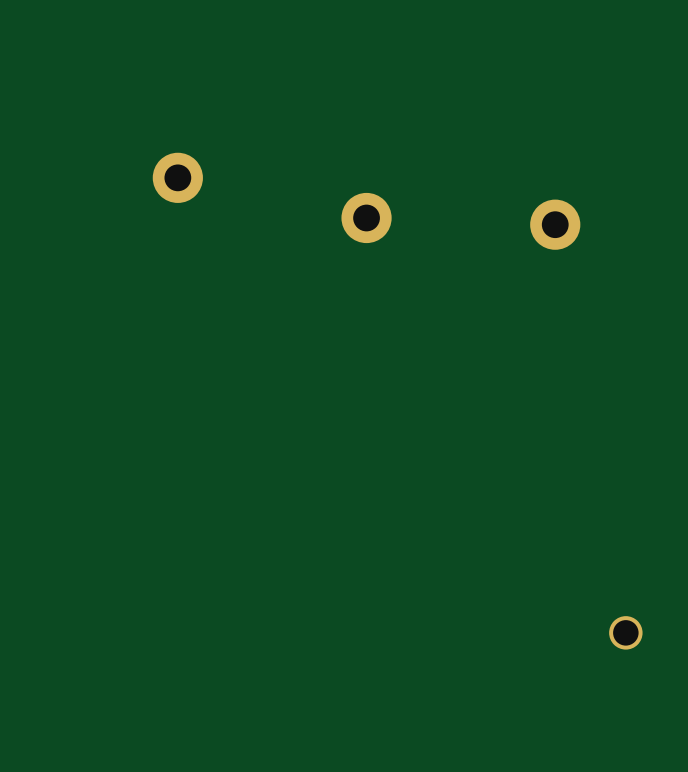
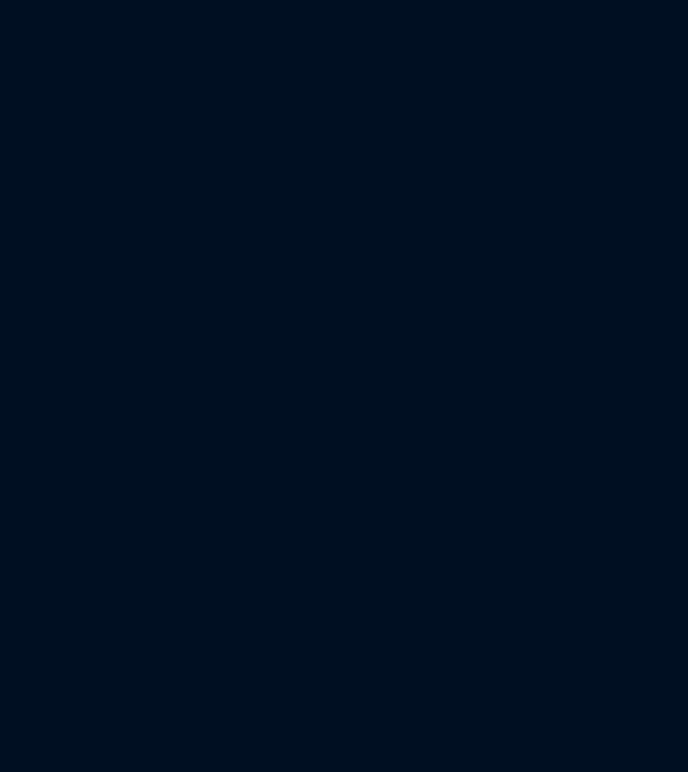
part: (177, 177) -> none
part: (366, 218) -> none
part: (555, 224) -> none
part: (625, 632) -> none

